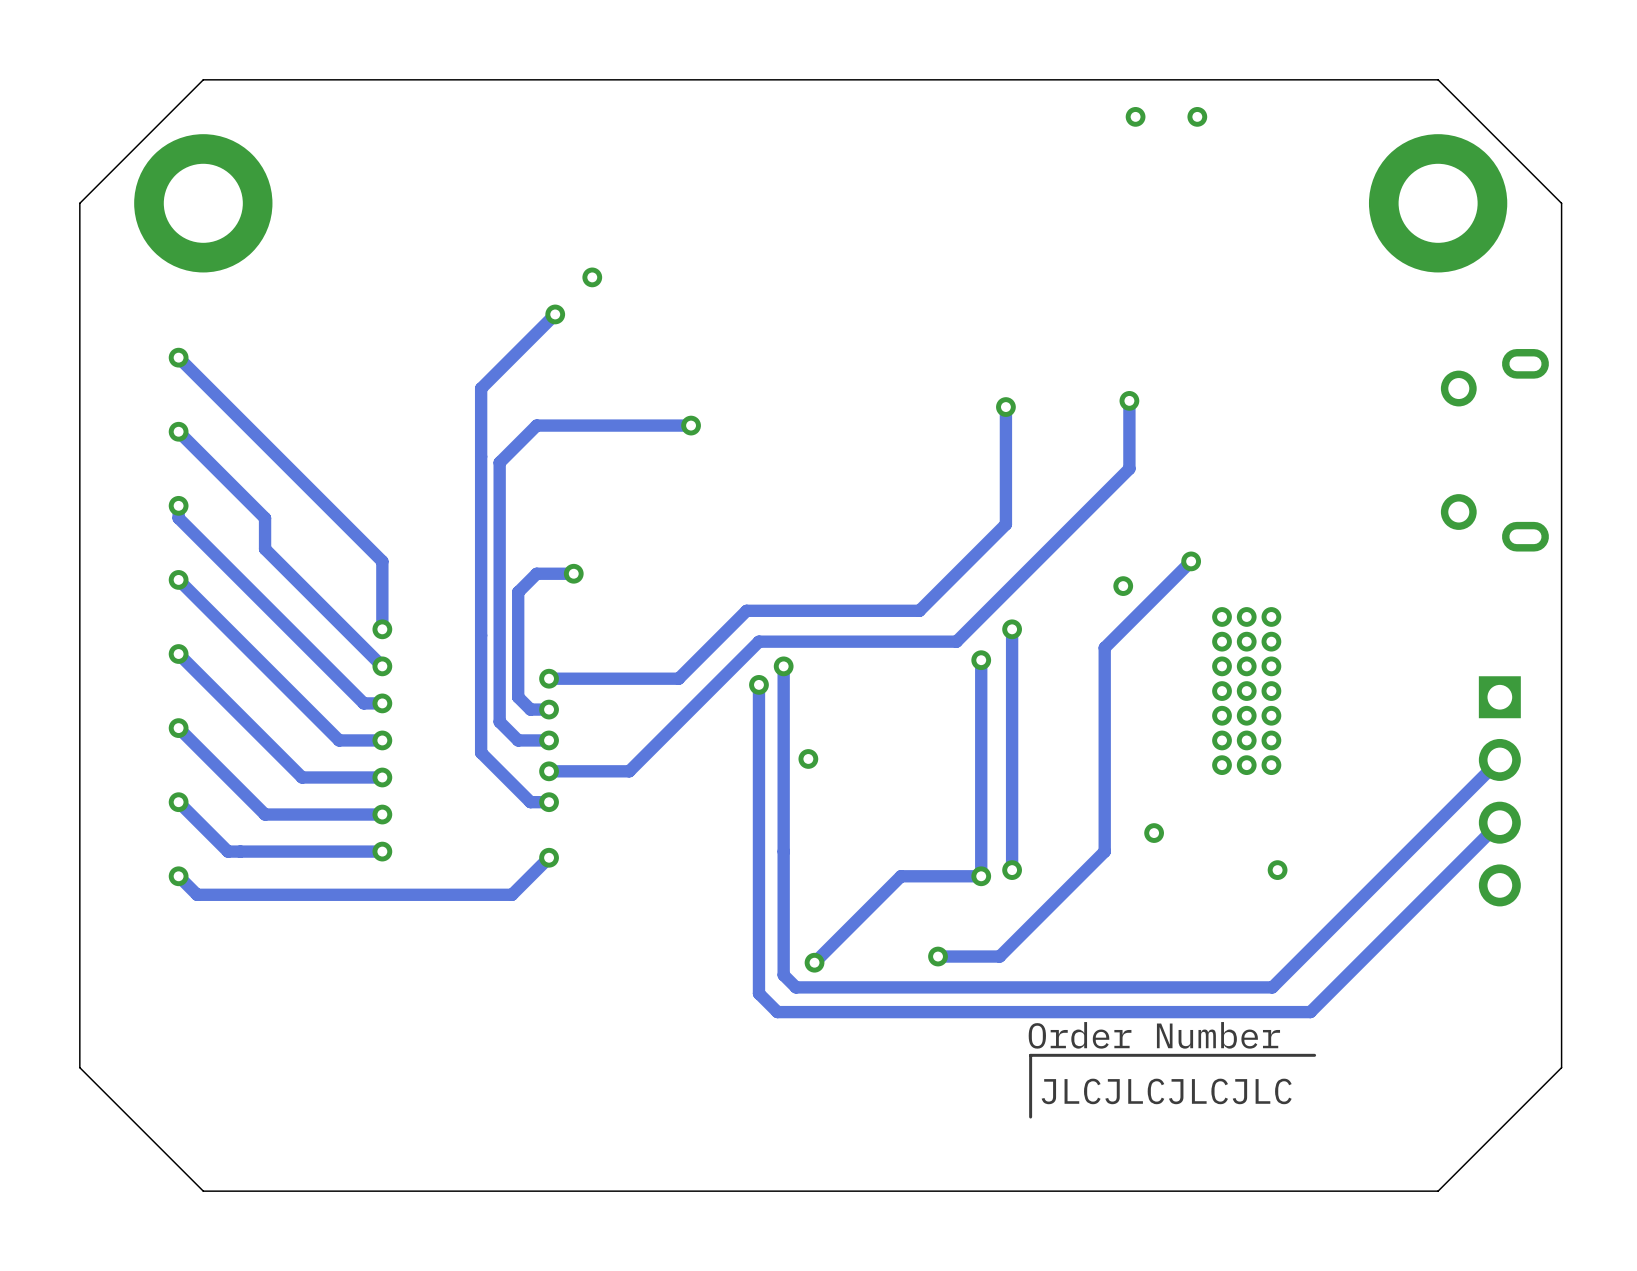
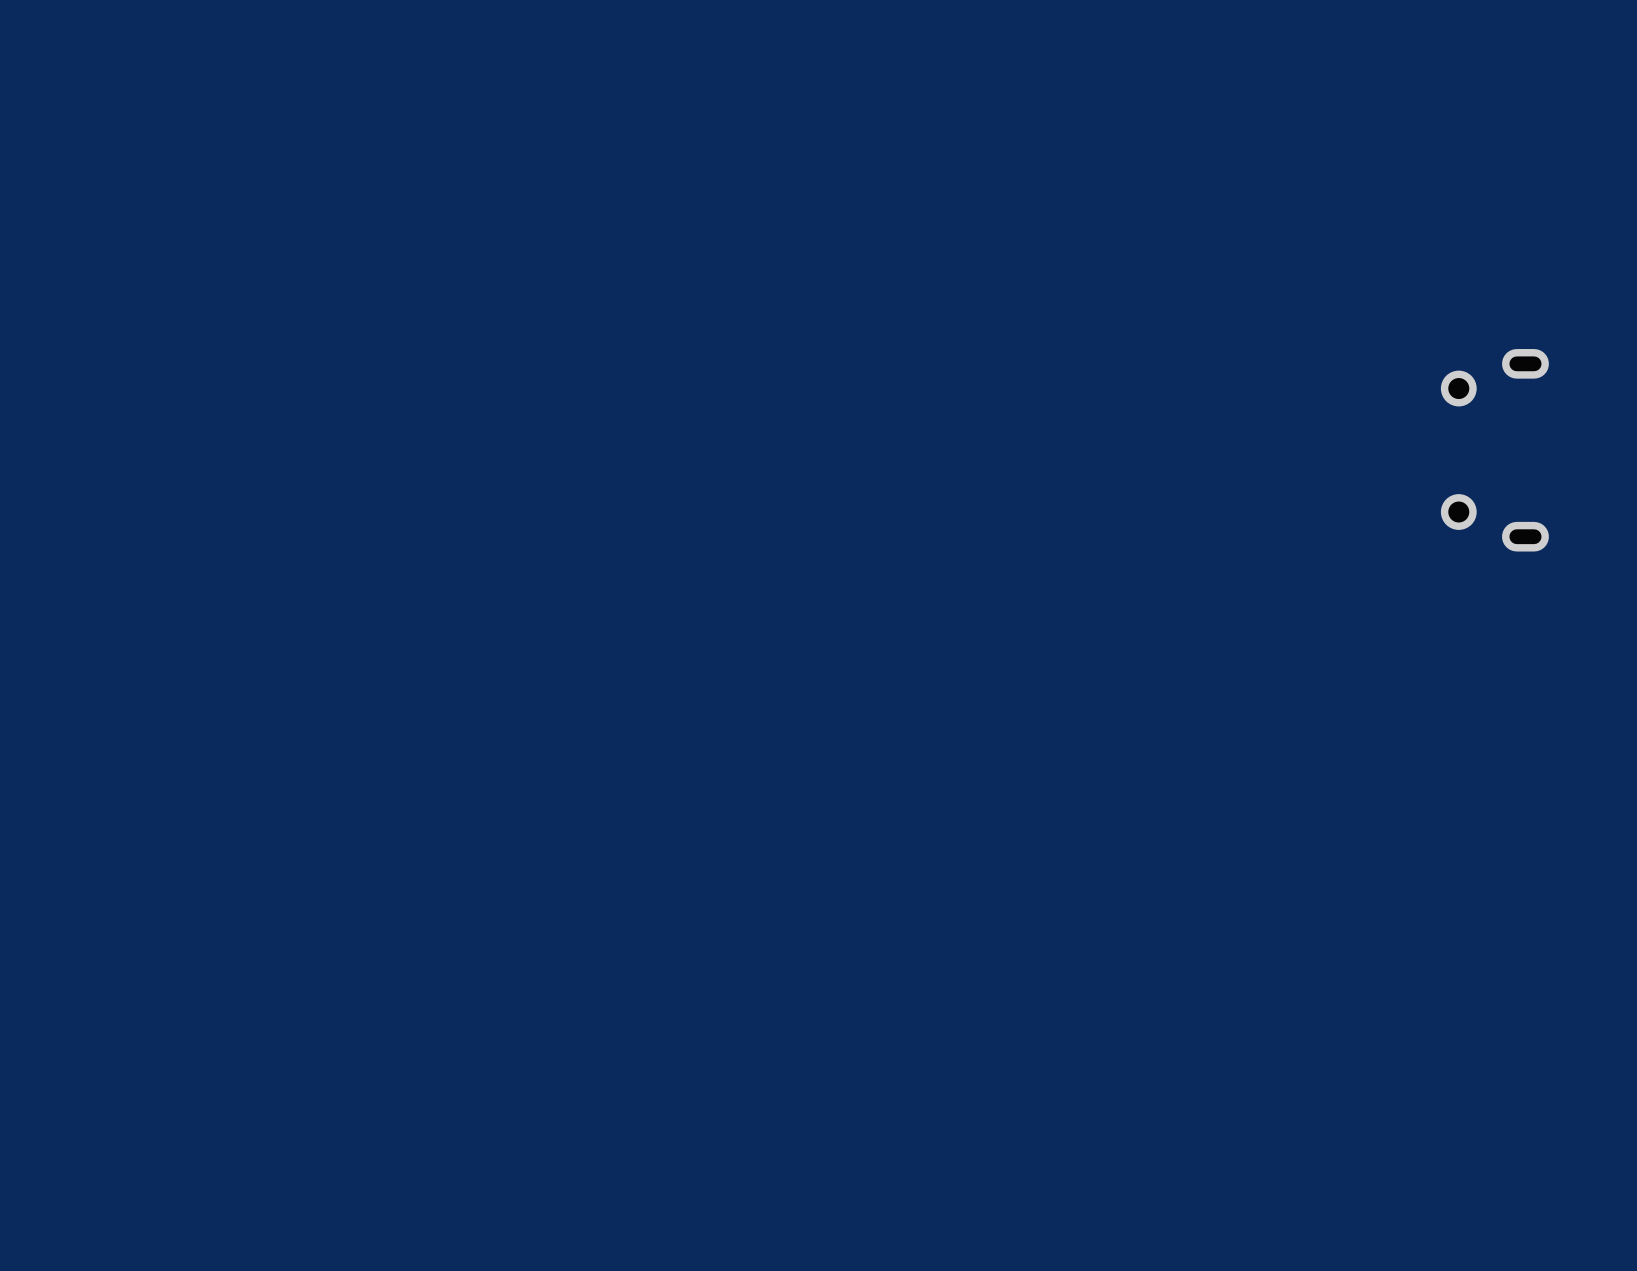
board edge: (1438, 79) (203, 79) (79, 203) (79, 1067) (203, 1191) (1438, 1191) (1561, 1067) (1561, 203) (1438, 79) -> none
via: (1135, 116) -> none
via: (1197, 116) -> none
part: (203, 203) -> none
part: (1438, 203) -> none
via: (592, 277) -> none
track: (555, 314) (481, 388) (481, 752) (530, 802) (549, 802) -> none
via: (555, 314) -> none
track: (178, 357) (382, 561) (382, 629) -> none
via: (178, 357) -> none
track: (1129, 400) (1129, 468) (956, 641) (758, 641) (629, 771) (549, 771) -> none
via: (1129, 400) -> none
track: (1005, 407) (1005, 524) (919, 610) (746, 610) (678, 678) (549, 678) -> none
via: (1005, 407) -> none
track: (691, 425) (536, 425) (499, 462) (499, 721) (518, 740) (549, 740) -> none
via: (691, 425) -> none
track: (178, 431) (265, 518) (265, 549) (382, 666) -> none
via: (178, 431) -> none
track: (178, 505) (178, 518) (363, 703) (382, 703) -> none
via: (178, 505) -> none
track: (1191, 561) (1104, 647) (1104, 851) (999, 956) (938, 956) -> none
via: (1191, 561) -> none
track: (573, 573) (536, 573) (518, 592) (518, 697) (530, 709) (549, 709) -> none
via: (573, 573) -> none
track: (178, 579) (339, 740) (382, 740) -> none
via: (178, 579) -> none
via: (1123, 586) -> none
via: (1222, 616) -> none
via: (1246, 616) -> none
via: (1271, 616) -> none
via: (382, 629) -> none
track: (1012, 629) (1012, 870) -> none
via: (1012, 629) -> none
via: (1222, 641) -> none
via: (1246, 641) -> none
via: (1271, 641) -> none
track: (178, 654) (302, 777) (382, 777) -> none
via: (178, 654) -> none
track: (981, 660) (981, 876) (900, 876) (814, 962) -> none
via: (981, 660) -> none
via: (382, 666) -> none
track: (783, 666) (783, 975) (796, 987) (1272, 987) (1499, 759) -> none
via: (783, 666) -> none
via: (1222, 666) -> none
via: (1246, 666) -> none
via: (1271, 666) -> none
via: (549, 678) -> none
track: (758, 684) (758, 993) (777, 1012) (1310, 1012) (1499, 822) -> none
via: (758, 684) -> none
via: (1222, 691) -> none
via: (1246, 691) -> none
via: (1271, 691) -> none
via: (382, 703) -> none
via: (549, 709) -> none
via: (1222, 715) -> none
via: (1246, 715) -> none
via: (1271, 715) -> none
track: (178, 728) (265, 814) (382, 814) -> none
via: (178, 728) -> none
via: (382, 740) -> none
via: (549, 740) -> none
via: (1222, 740) -> none
via: (1246, 740) -> none
via: (1271, 740) -> none
via: (808, 758) -> none
via: (1222, 765) -> none
via: (1246, 765) -> none
via: (1271, 765) -> none
via: (549, 771) -> none
via: (382, 777) -> none
part: (1499, 791) -> none
track: (178, 802) (228, 851) (382, 851) -> none
via: (178, 802) -> none
via: (549, 802) -> none
via: (382, 814) -> none
via: (1154, 833) -> none
via: (382, 851) -> none
track: (549, 857) (512, 894) (197, 894) (178, 876) -> none
via: (549, 857) -> none
via: (1012, 870) -> none
via: (1277, 870) -> none
via: (178, 876) -> none
via: (981, 876) -> none
via: (938, 956) -> none
via: (814, 962) -> none
text: Order Number (1154, 1035) -> none
line: (1314, 1055) (1030, 1055) (1030, 1117) -> none
text: JLCJLCJLCJLC (1166, 1091) -> none

